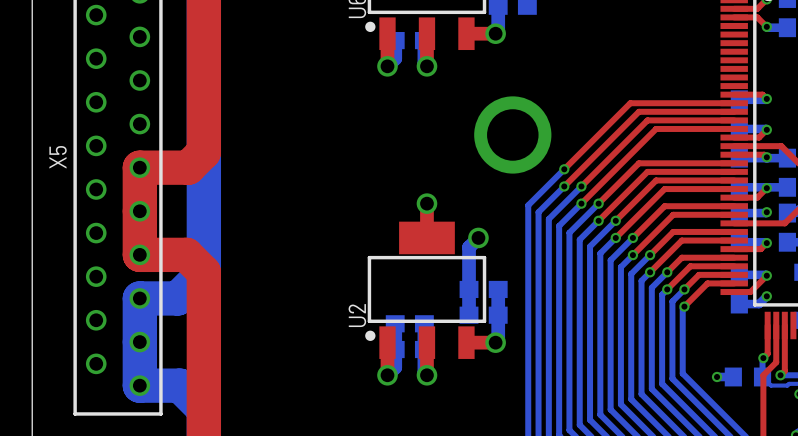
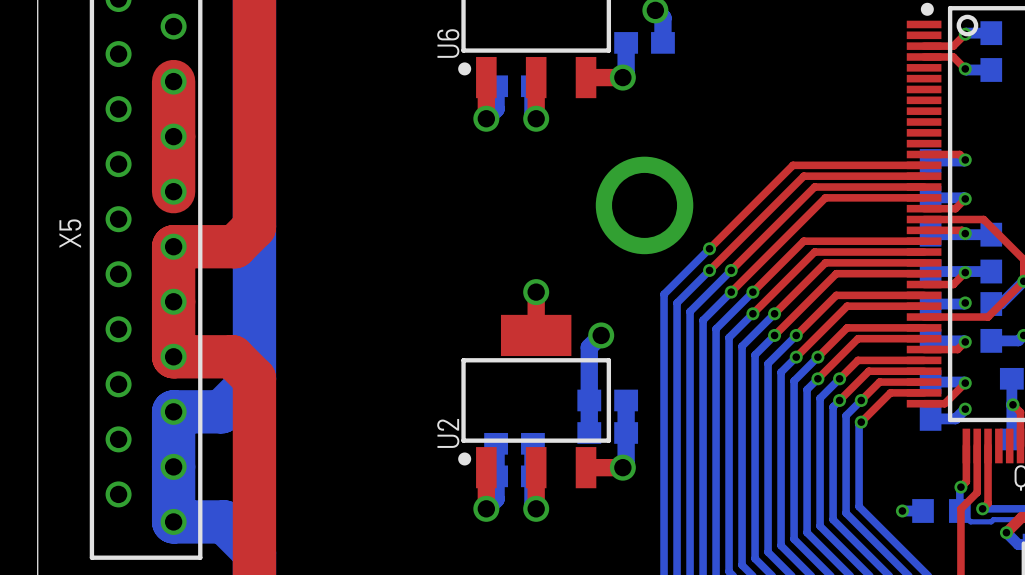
top track: none -> (173, 81) (173, 191)

